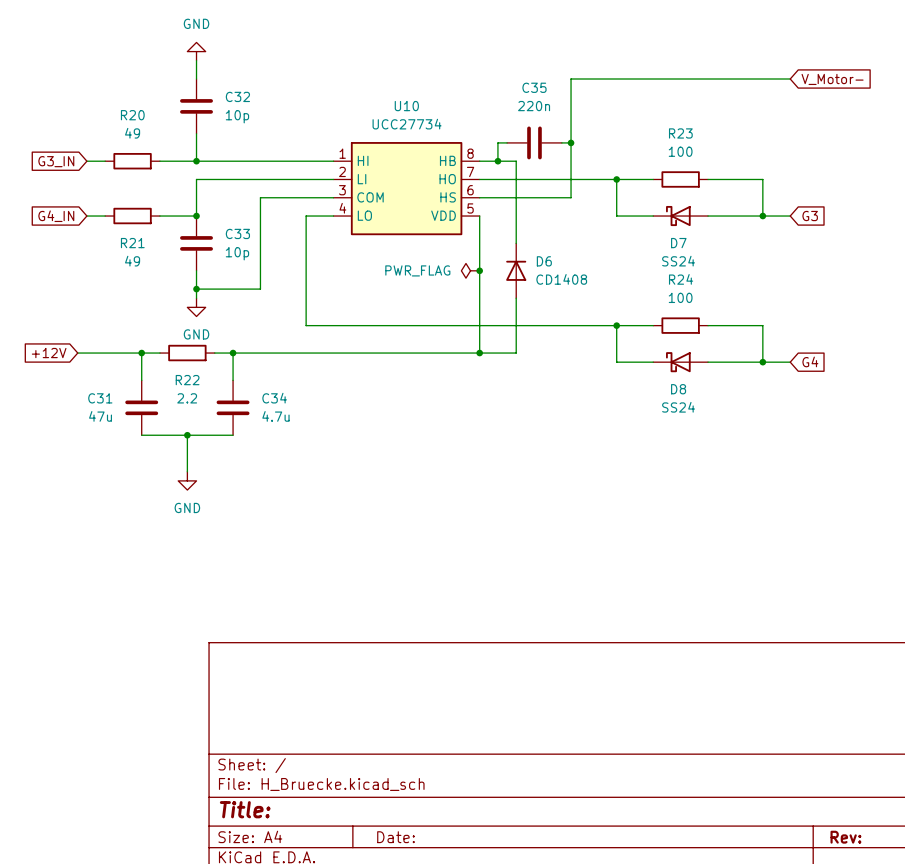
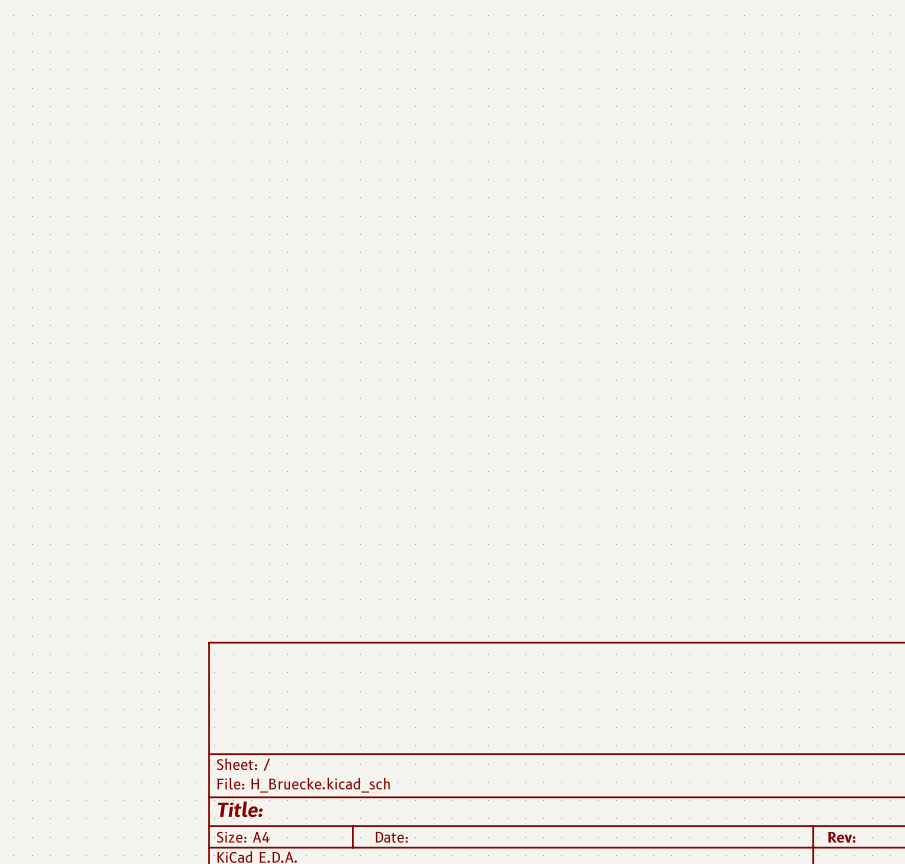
power symbol: GND (196, 51) -> none
wire: (196, 60) (196, 79) -> none
wire: (790, 79) (571, 79) (571, 197) (479, 197) -> none
global label: V_Motor- (832, 79) -> none
C32: 10p (196, 106) -> none
wire: (196, 133) (196, 161) -> none
wire: (507, 142) (497, 142) (497, 161) -> none
C35: 220n (534, 142) -> none
wire: (561, 142) (571, 142) -> none
junction: (571, 142) -> none
global label: G3_IN (56, 161) -> none
wire: (86, 161) (105, 161) -> none
R20: 49 (132, 161) -> none
wire: (159, 161) (333, 161) -> none
junction: (196, 161) -> none
wire: (479, 161) (516, 161) (516, 243) -> none
junction: (497, 161) -> none
wire: (333, 179) (196, 179) (196, 216) (159, 216) -> none
wire: (479, 179) (653, 179) -> none
wire: (616, 179) (616, 216) (653, 216) -> none
junction: (616, 179) -> none
R23: 100 (680, 179) -> none
wire: (708, 179) (762, 179) (762, 216) -> none
U10: UCC27734 (406, 188) -> none
wire: (333, 197) (260, 197) (260, 289) (196, 289) -> none
global label: G4_IN (56, 216) -> none
wire: (86, 216) (105, 216) -> none
R21: 49 (132, 216) -> none
junction: (196, 216) -> none
wire: (333, 216) (306, 216) (306, 325) (653, 325) -> none
wire: (479, 216) (479, 353) -> none
D7: SS24 (680, 216) -> none
wire: (708, 216) (790, 216) -> none
junction: (762, 216) -> none
global label: G3 (810, 216) -> none
C33: 10p (196, 243) -> none
wire: (196, 270) (196, 298) -> none
power symbol: PWR_FLAG (470, 270) -> none
junction: (479, 270) -> none
D6: CD1408 (516, 270) -> none
junction: (196, 289) -> none
wire: (516, 298) (516, 353) (214, 353) -> none
power symbol: GND (196, 307) -> none
wire: (616, 325) (616, 362) (653, 362) -> none
junction: (616, 325) -> none
R24: 100 (680, 325) -> none
wire: (708, 325) (762, 325) (762, 362) -> none
global label: +12V (49, 353) -> none
wire: (77, 353) (159, 353) -> none
wire: (141, 353) (141, 380) -> none
junction: (141, 353) -> none
R22: 2.2 (187, 353) -> none
wire: (233, 353) (233, 380) -> none
junction: (233, 353) -> none
junction: (479, 353) -> none
global label: G4 (810, 361) -> none
D8: SS24 (680, 362) -> none
wire: (708, 362) (790, 362) -> none
junction: (762, 362) -> none
C31: 47u (141, 407) -> none
C34: 4.7u (233, 407) -> none
wire: (141, 435) (233, 435) -> none
wire: (187, 435) (187, 471) -> none
junction: (187, 435) -> none
power symbol: GND (187, 480) -> none

